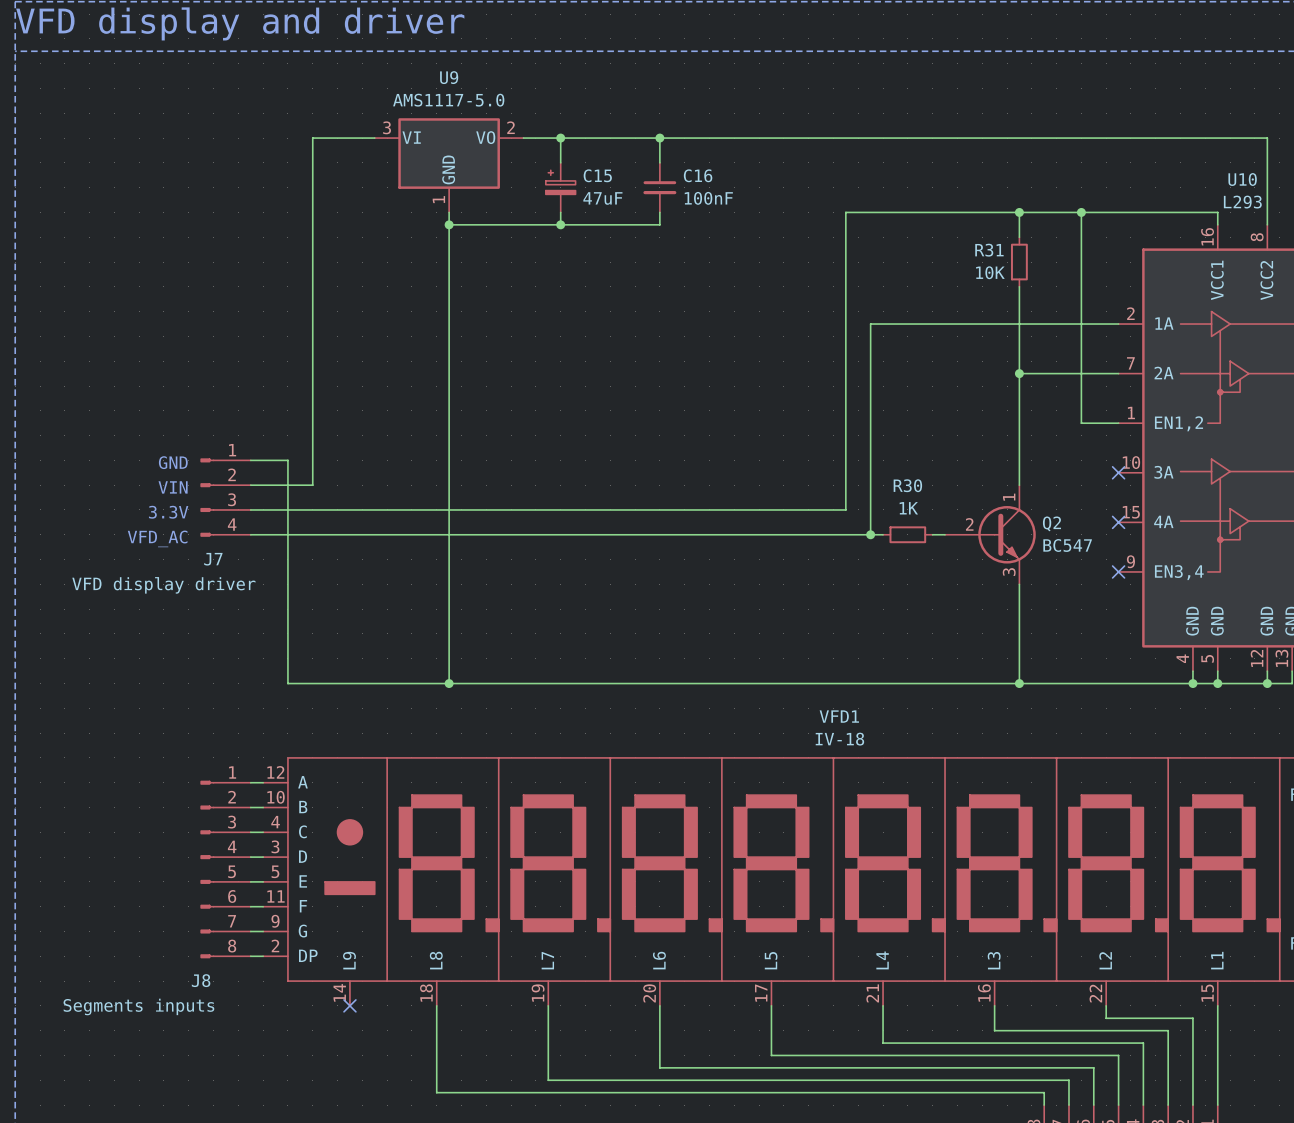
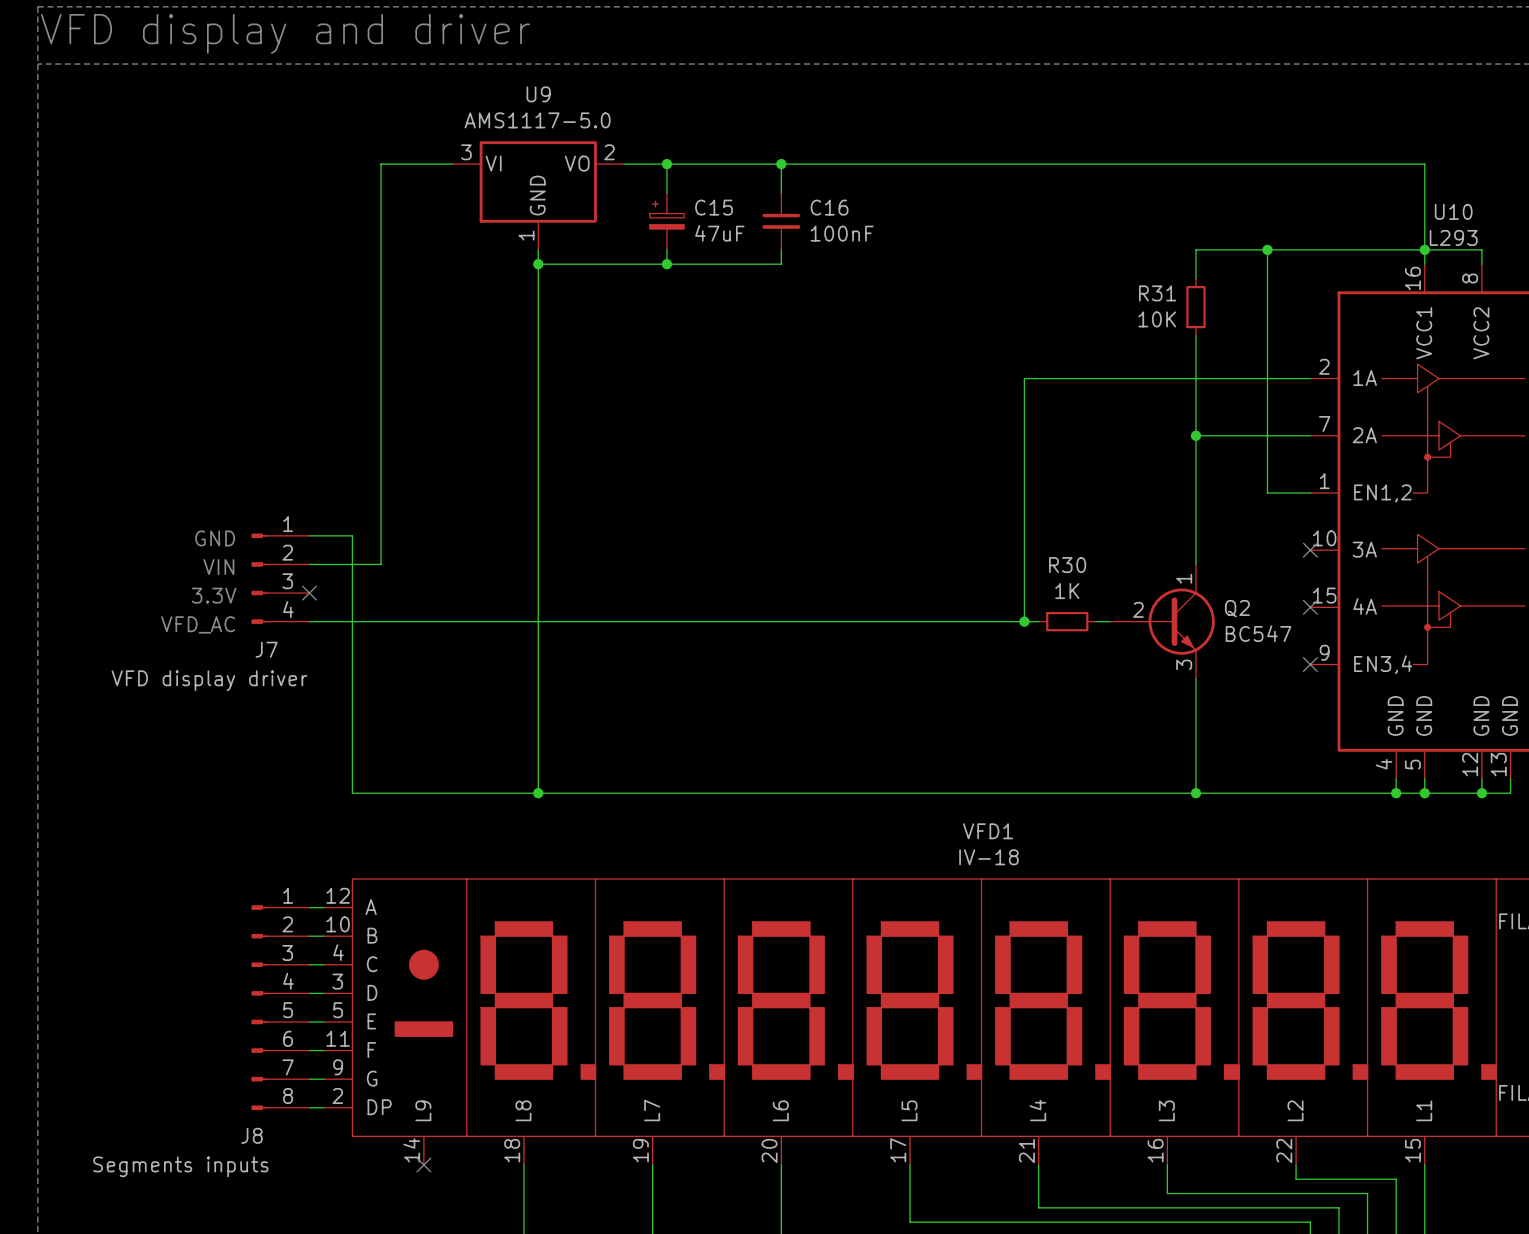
wire: (1217, 138) (1267, 138) (1267, 212) -> (1424, 164) (1424, 249) (1481, 249)
wire: (1019, 212) (845, 212) (845, 509) (250, 509) -> none
junction: (1019, 212) -> none
junction: none -> (1424, 249)
no-connect mark: none -> (309, 593)

